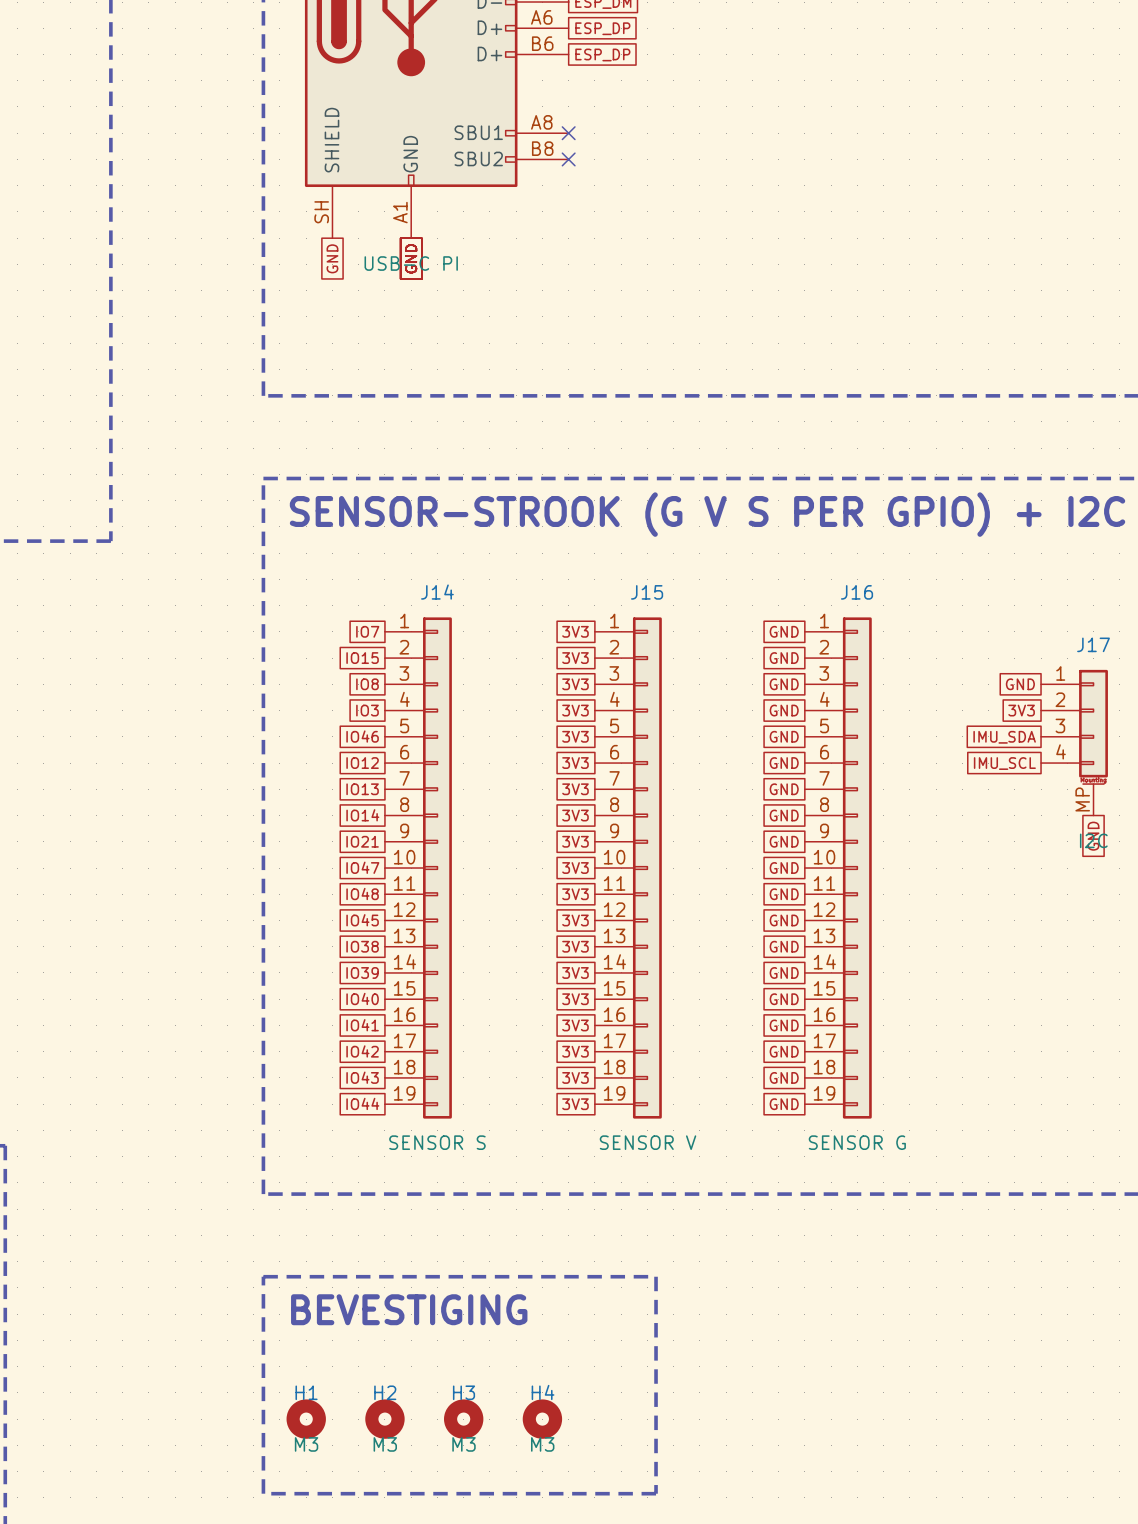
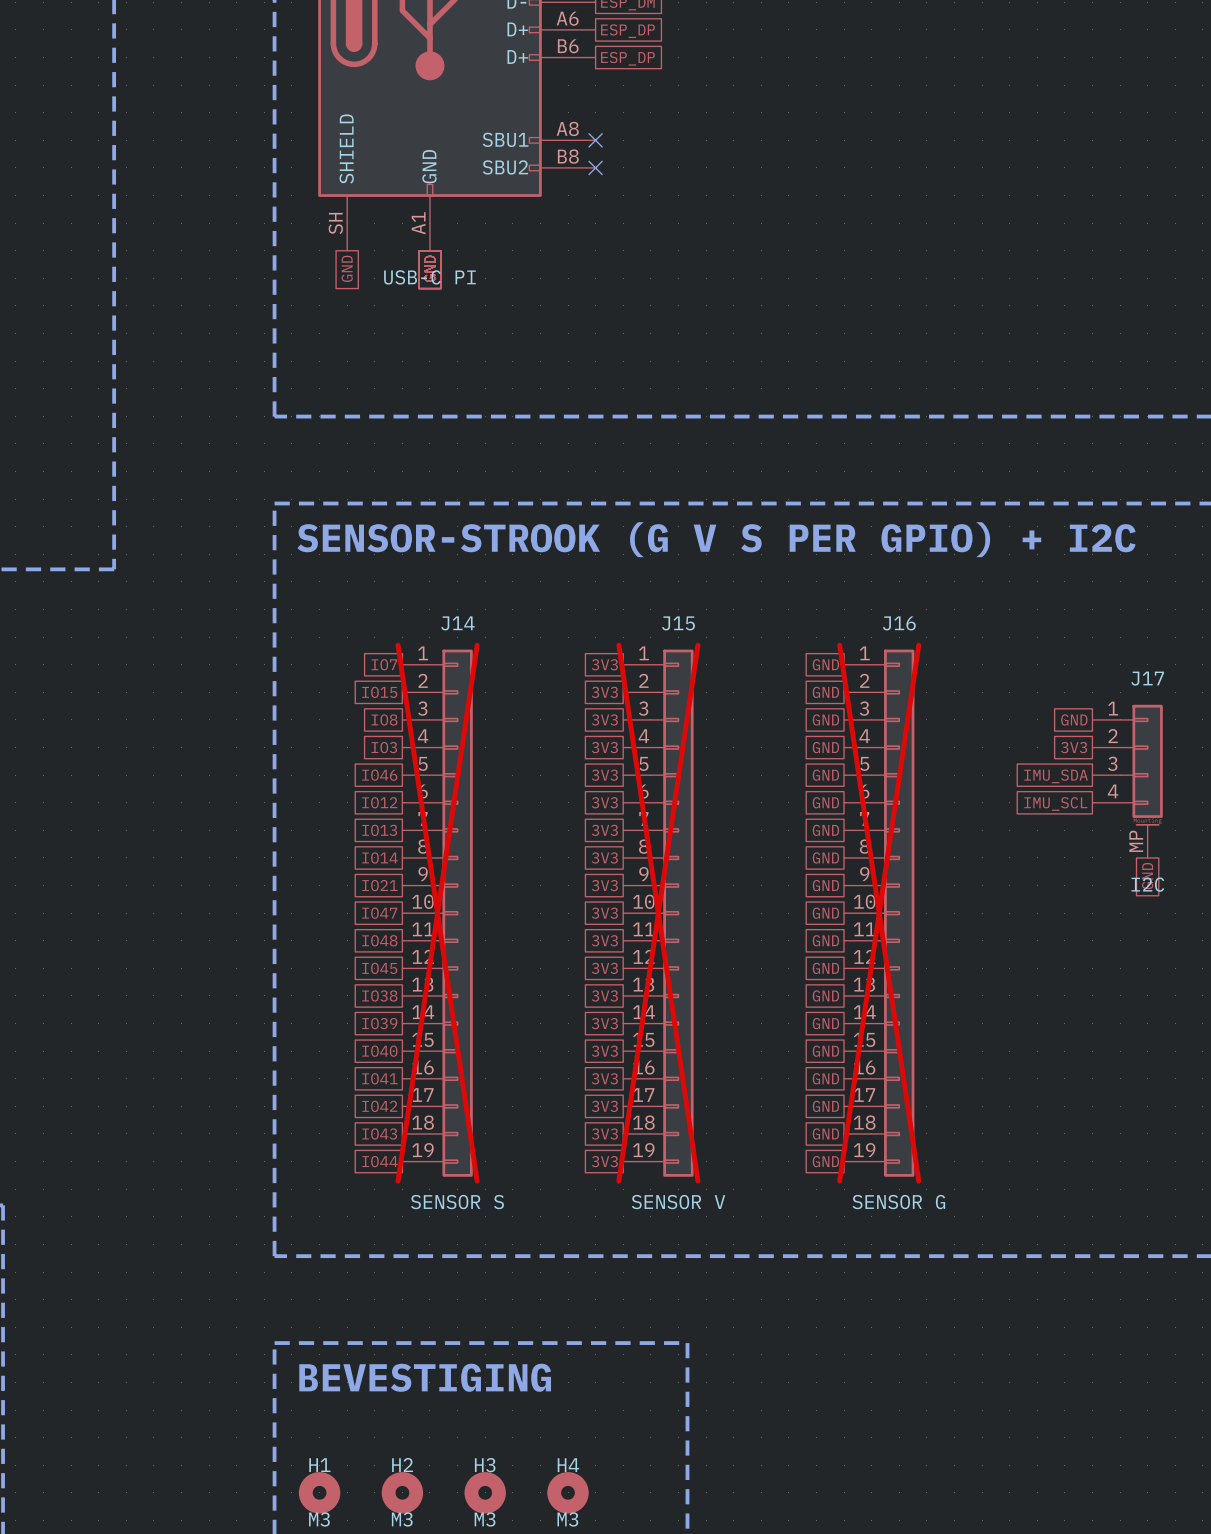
J14 do-not-place cross: none -> (437, 913)
J15 do-not-place cross: none -> (658, 913)
J16 do-not-place cross: none -> (879, 913)

